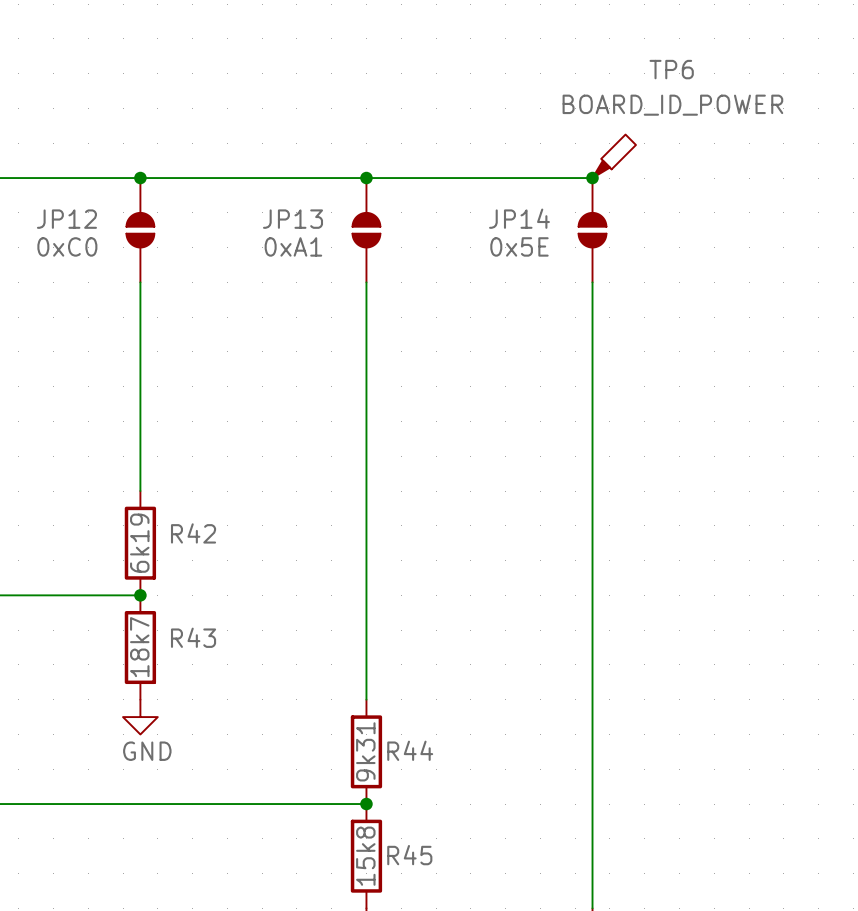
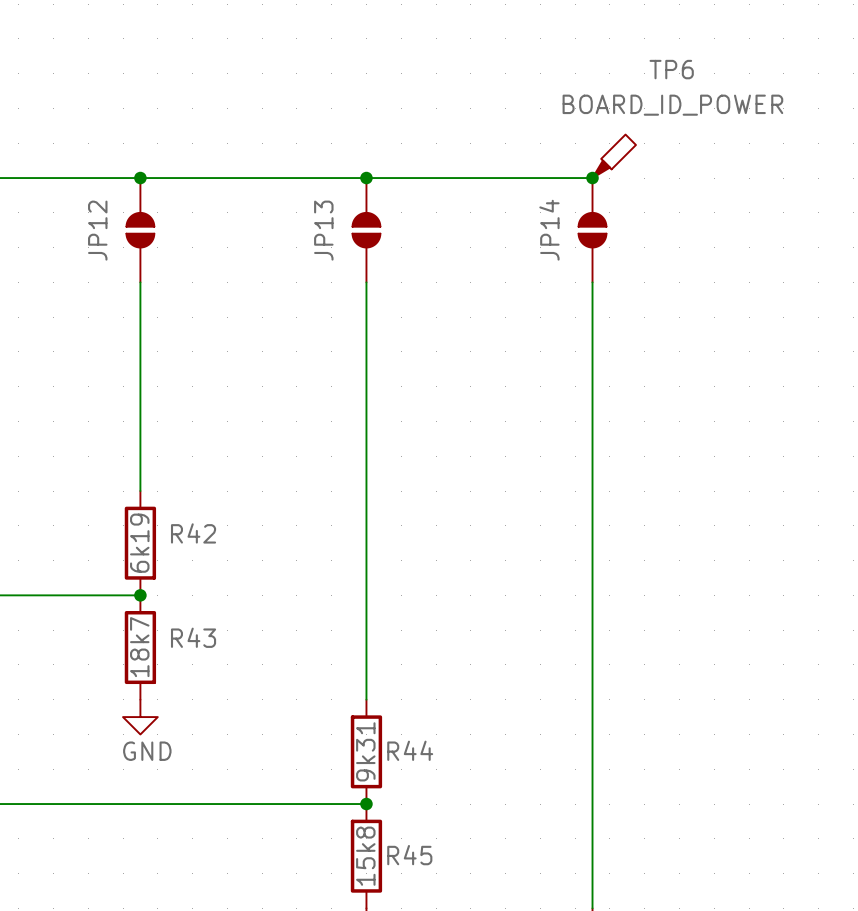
JP14 name rotation: 0° (519, 218) -> 90° counterclockwise (549, 230)
JP12 name rotation: 0° (66, 219) -> 90° counterclockwise (97, 230)
JP13 name rotation: 0° (293, 219) -> 90° counterclockwise (323, 230)
JP12 value: 0xC0 (67, 246) -> none
JP13 value: 0xA1 (293, 246) -> none
JP14 value: 0x5E (519, 246) -> none

